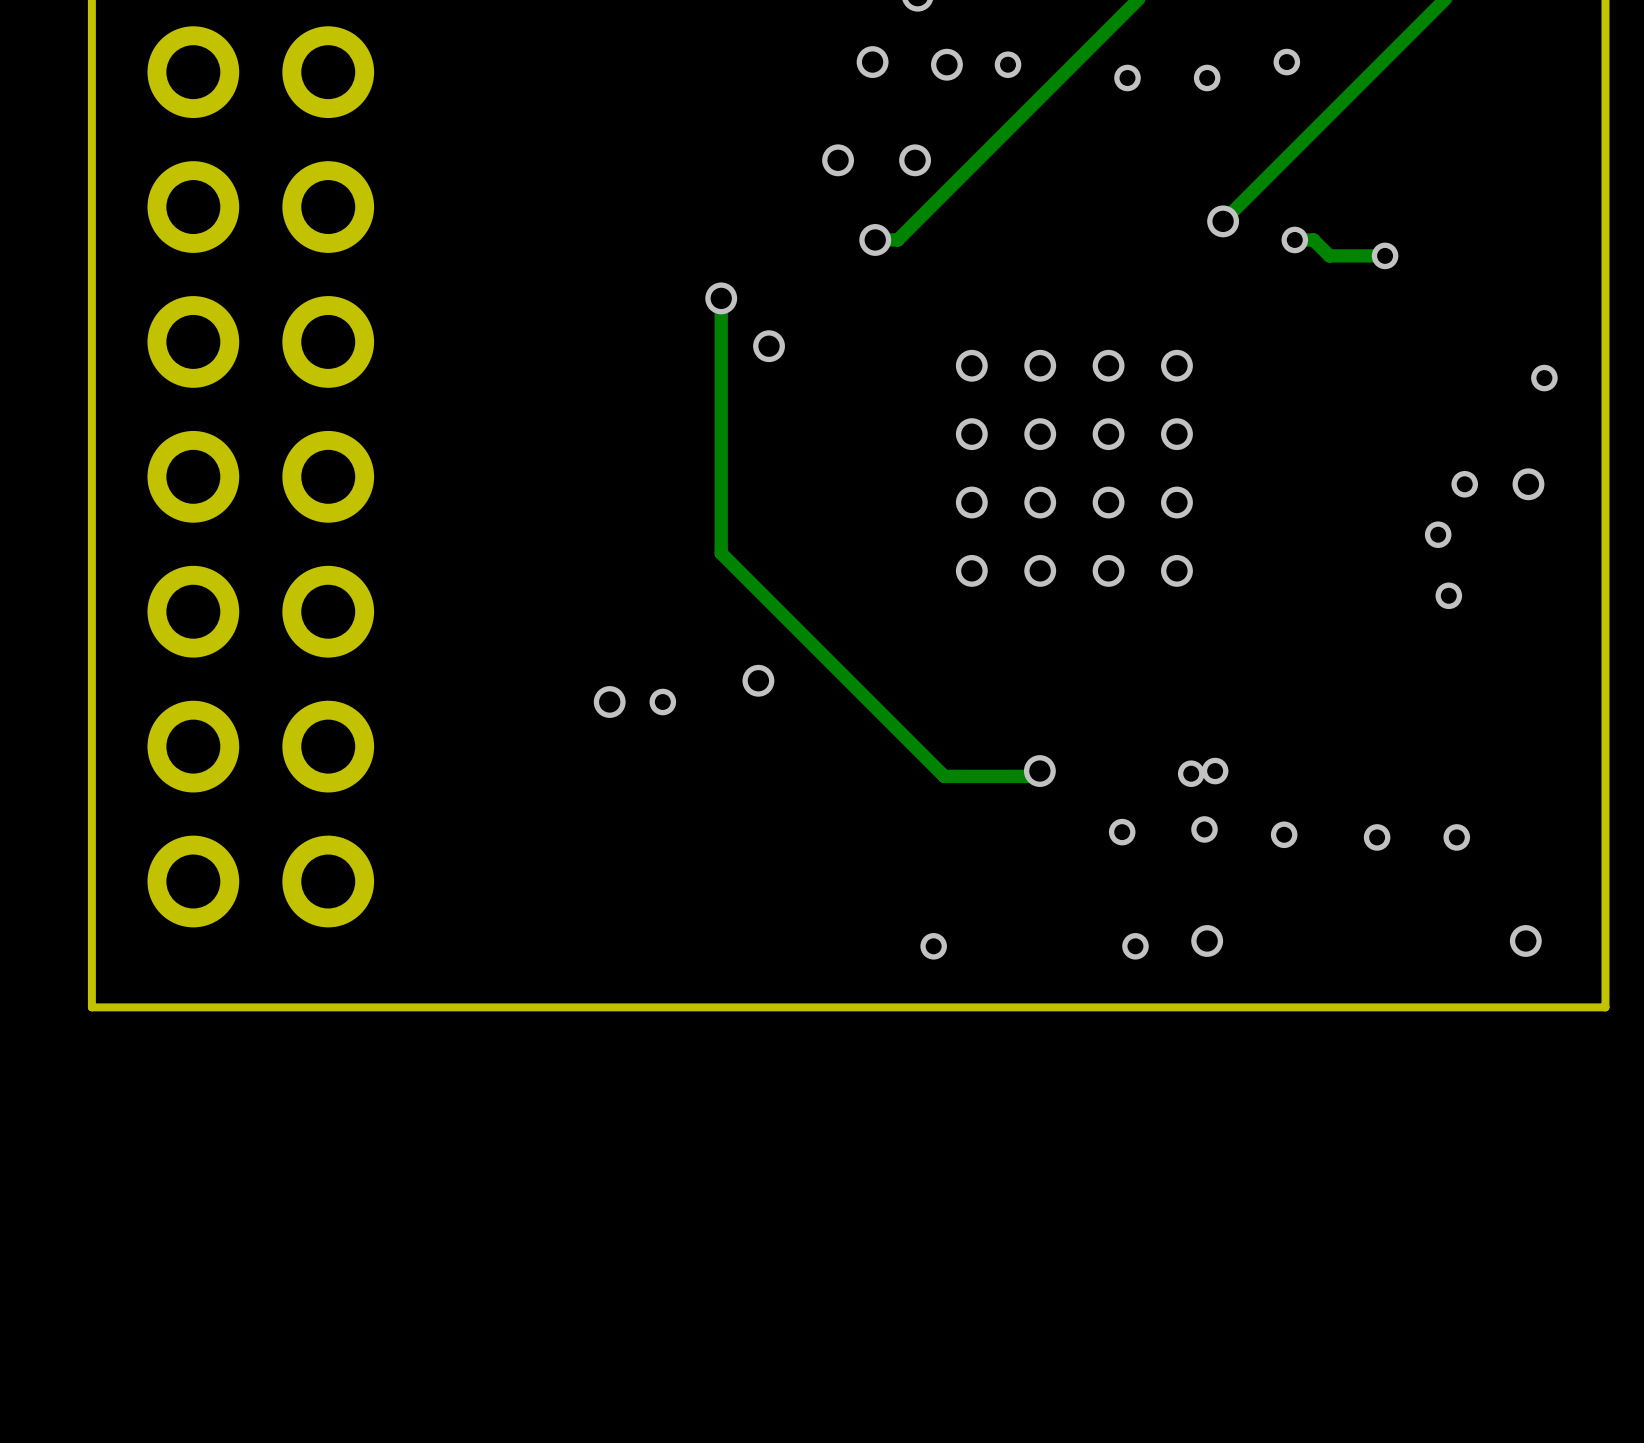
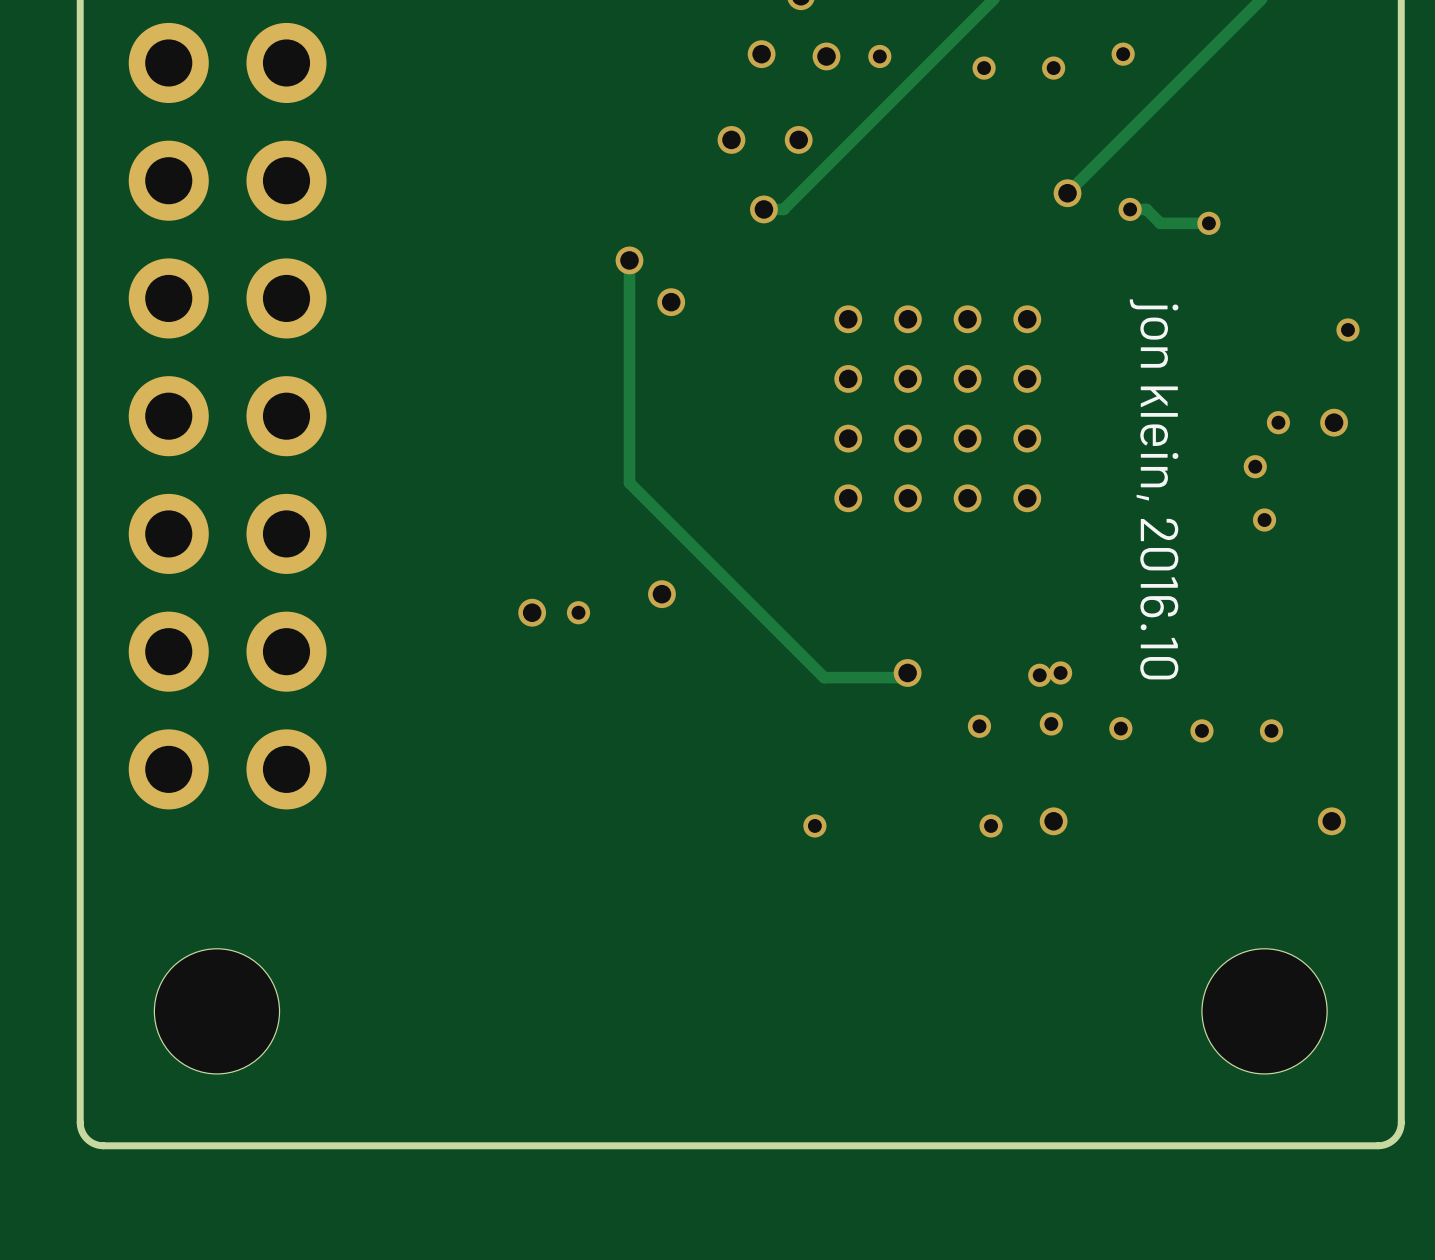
text: none -> jon klein, 2016.10 (1154, 489)
board edge: (1605, 1007) (91, 1007) -> (1401, 879) (1401, 1125) (1398, 1134) (1392, 1140) (1378, 1145) (97, 1144) (85, 1136) (80, 1122) (80, 879)
part: none -> (216, 1011)
part: none -> (1264, 1011)

